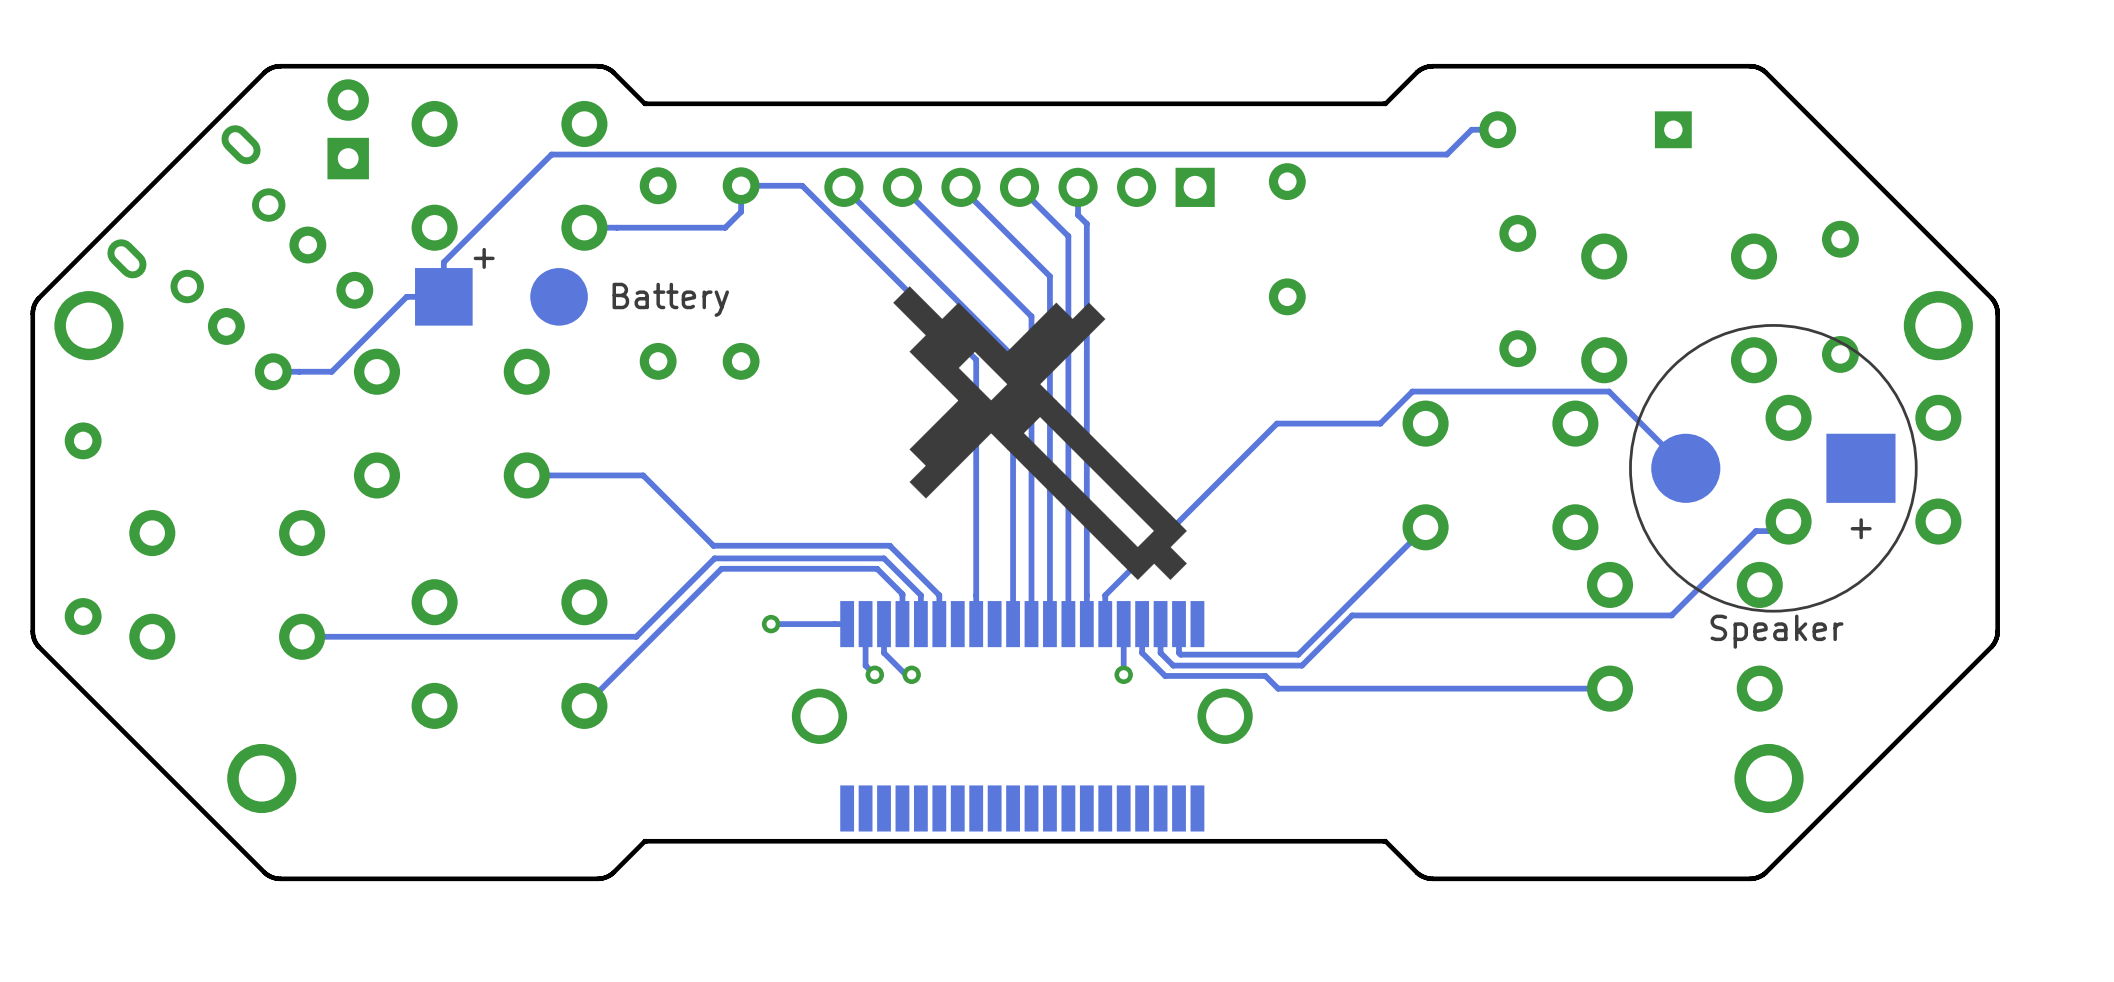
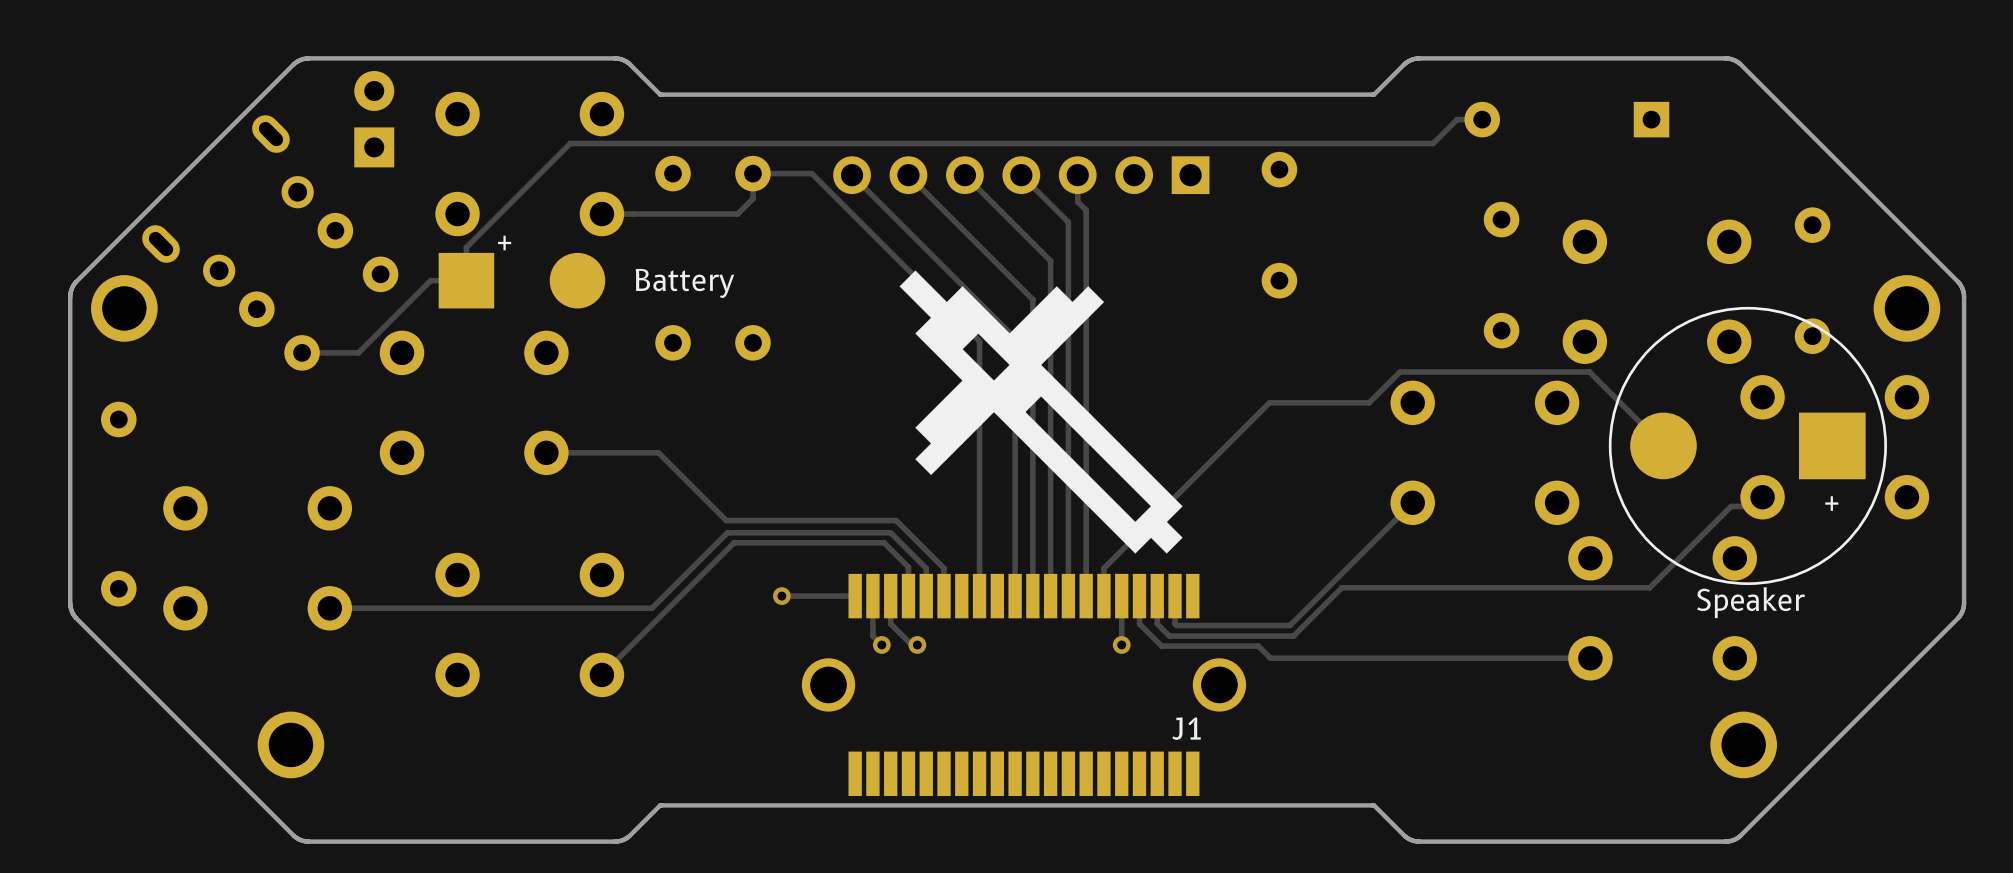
J1 name: none -> J1 (1186, 728)

